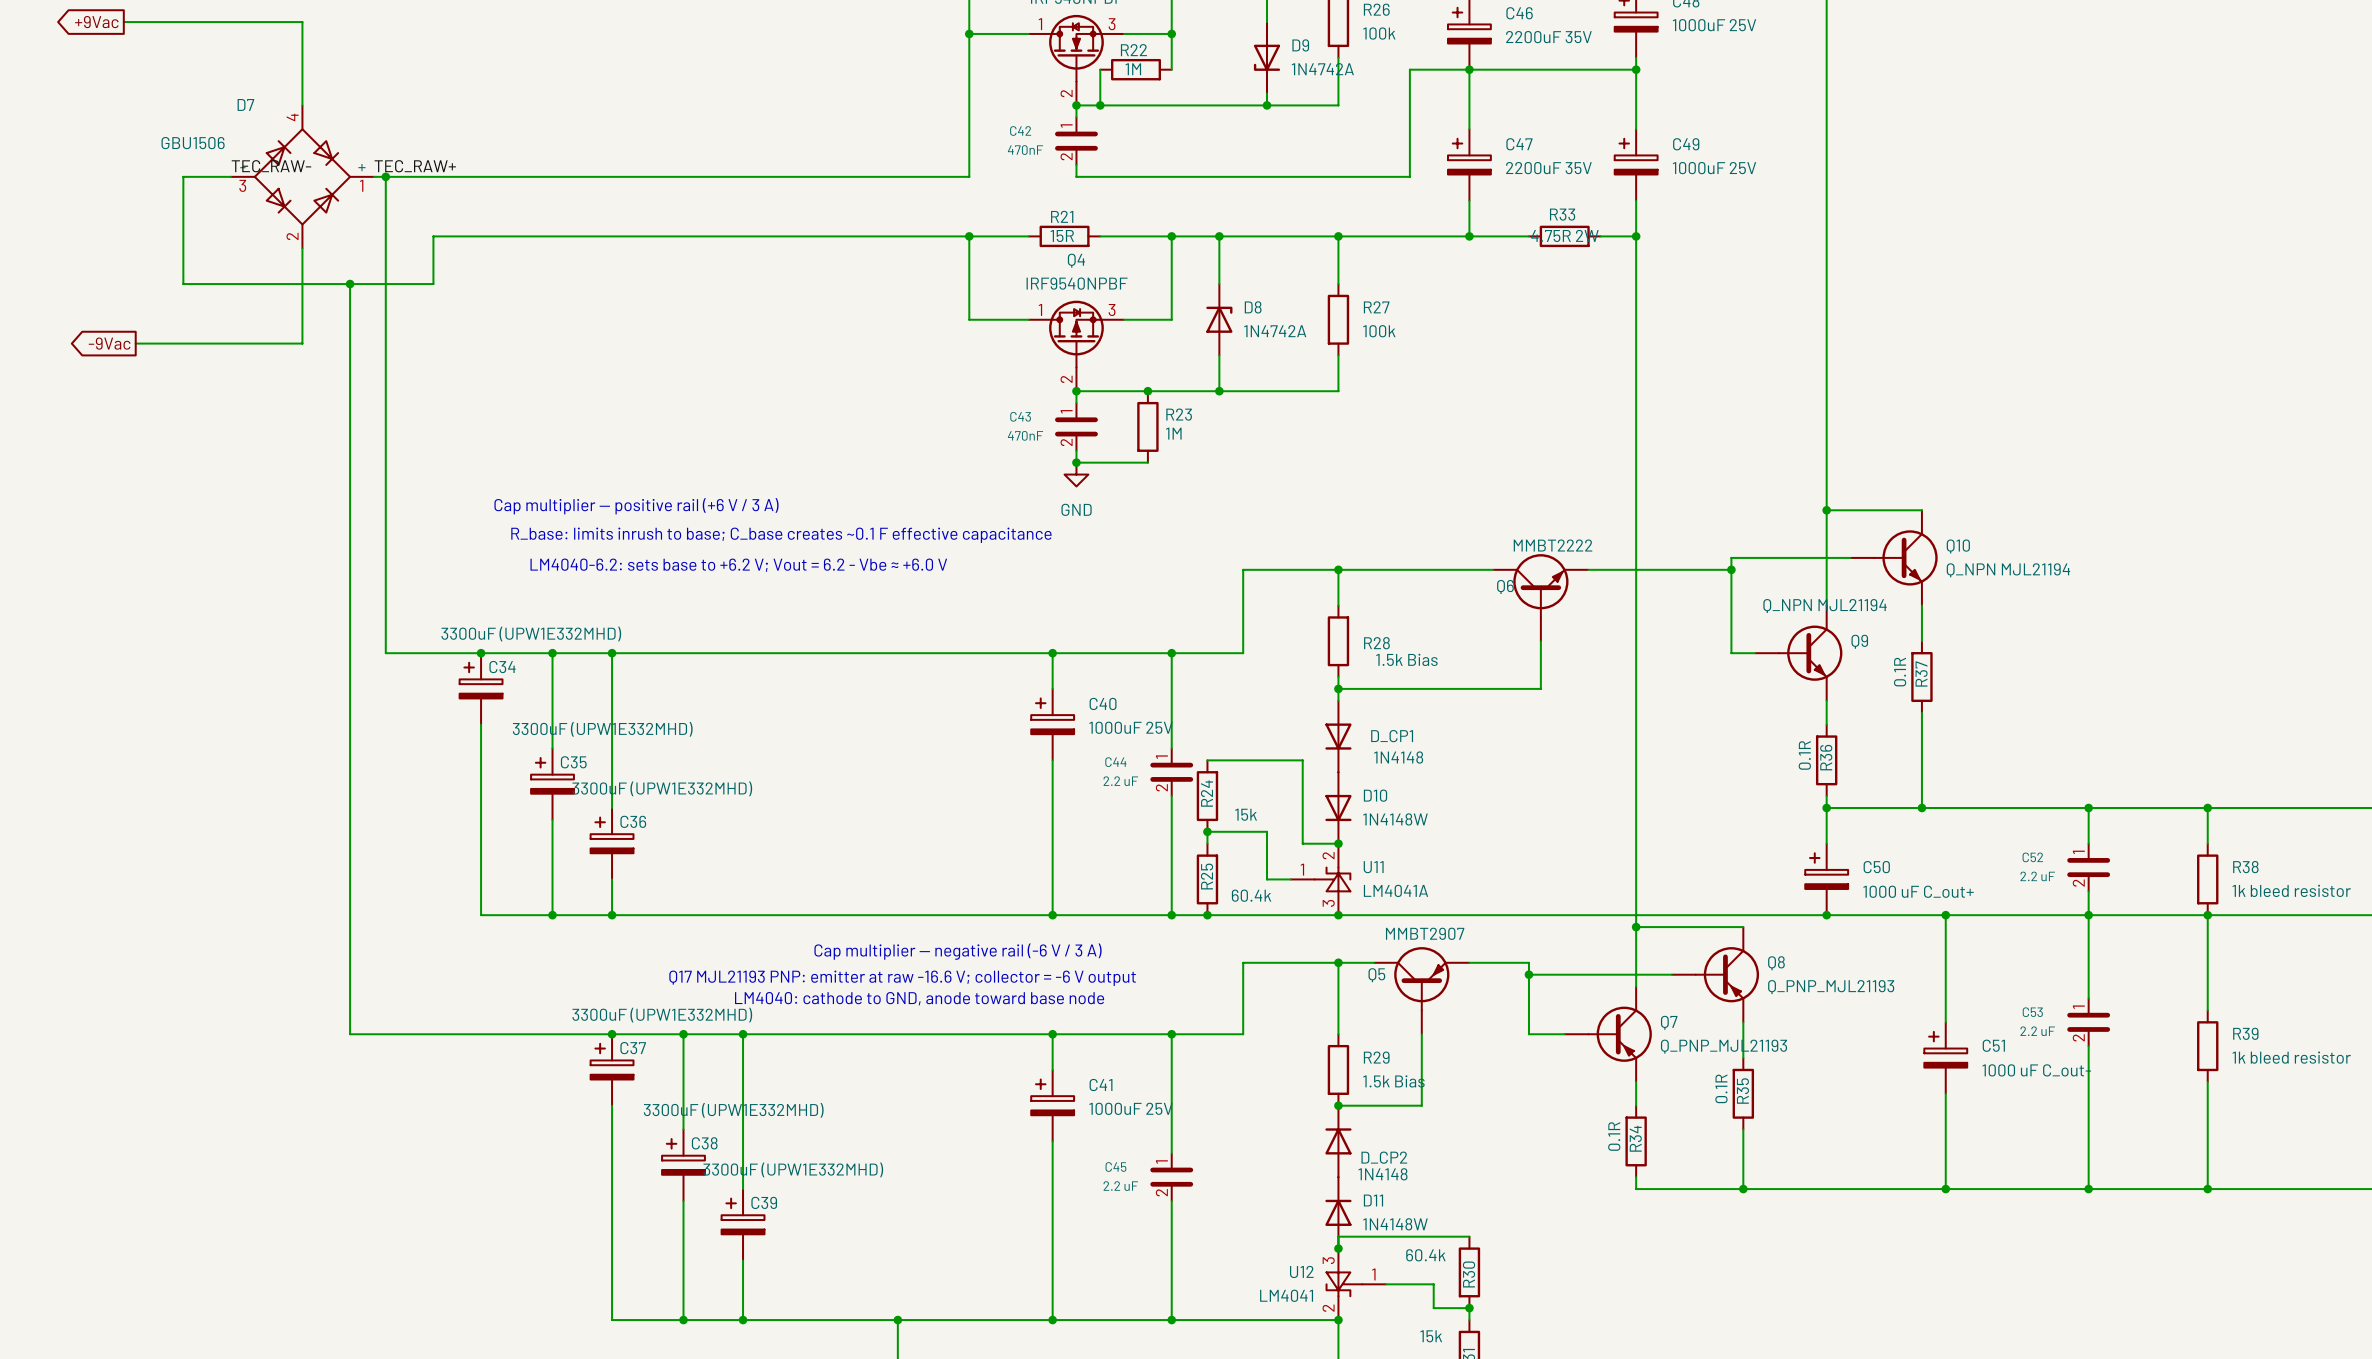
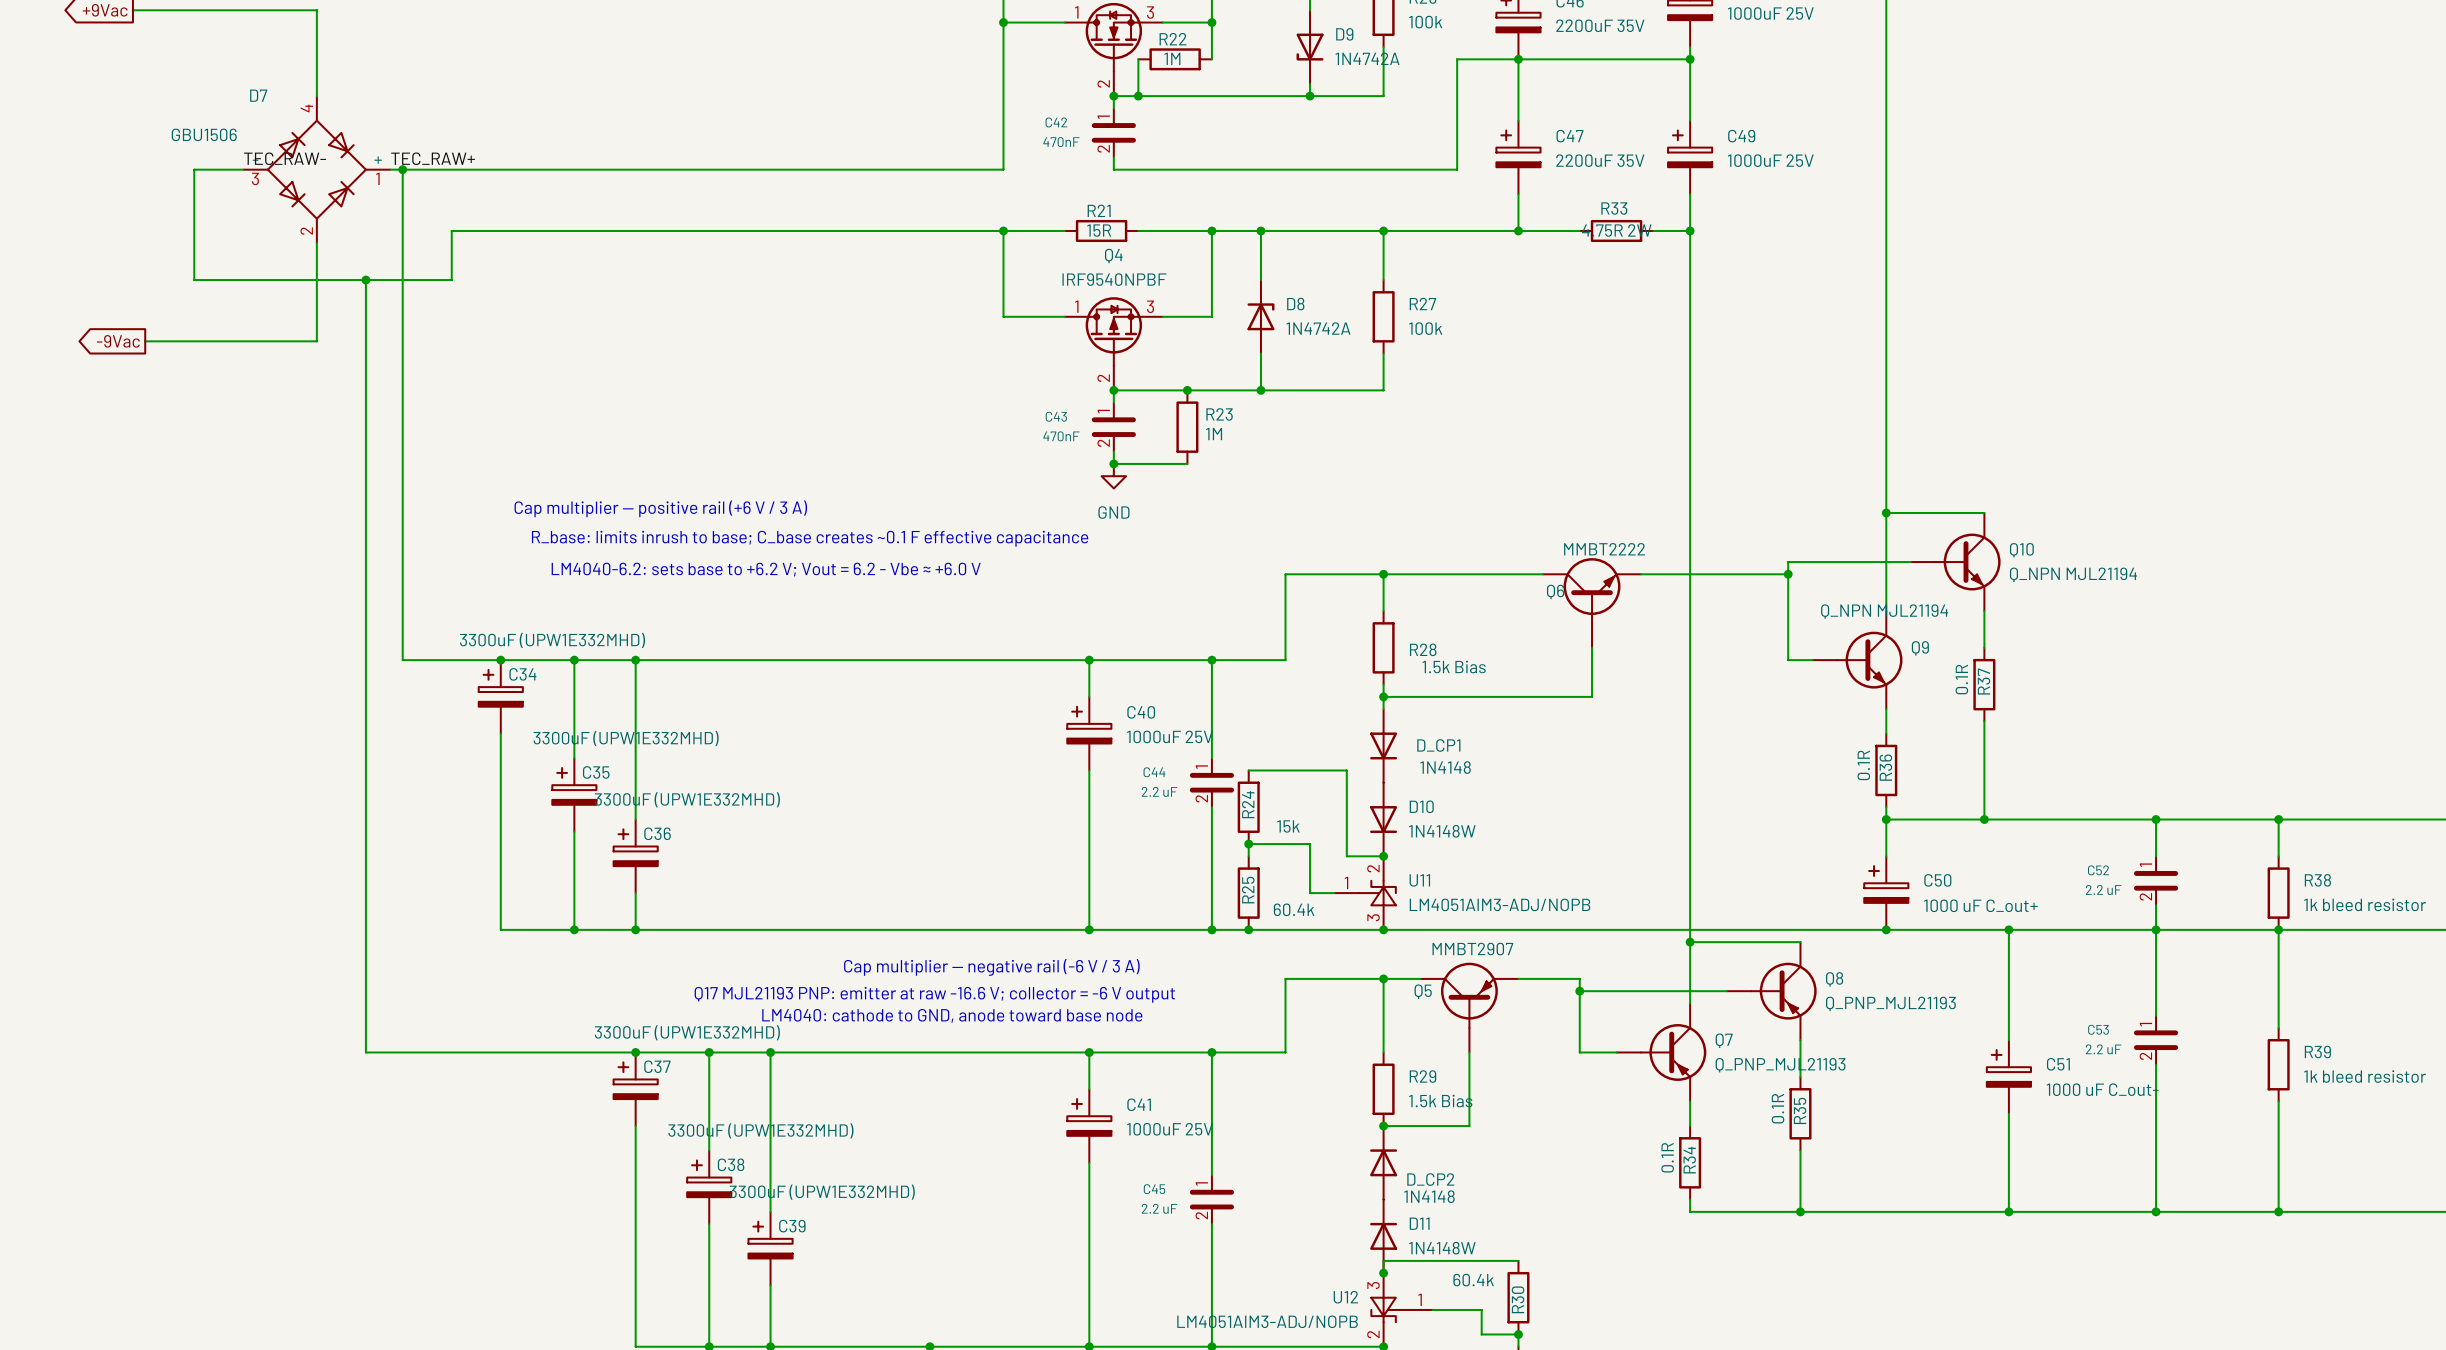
U11 value: LM4041A (1395, 890) -> LM4051AIM3-ADJ/NOPB (1500, 904)
U12 value: LM4041 (1286, 1295) -> LM4051AIM3-ADJ/NOPB (1267, 1321)

